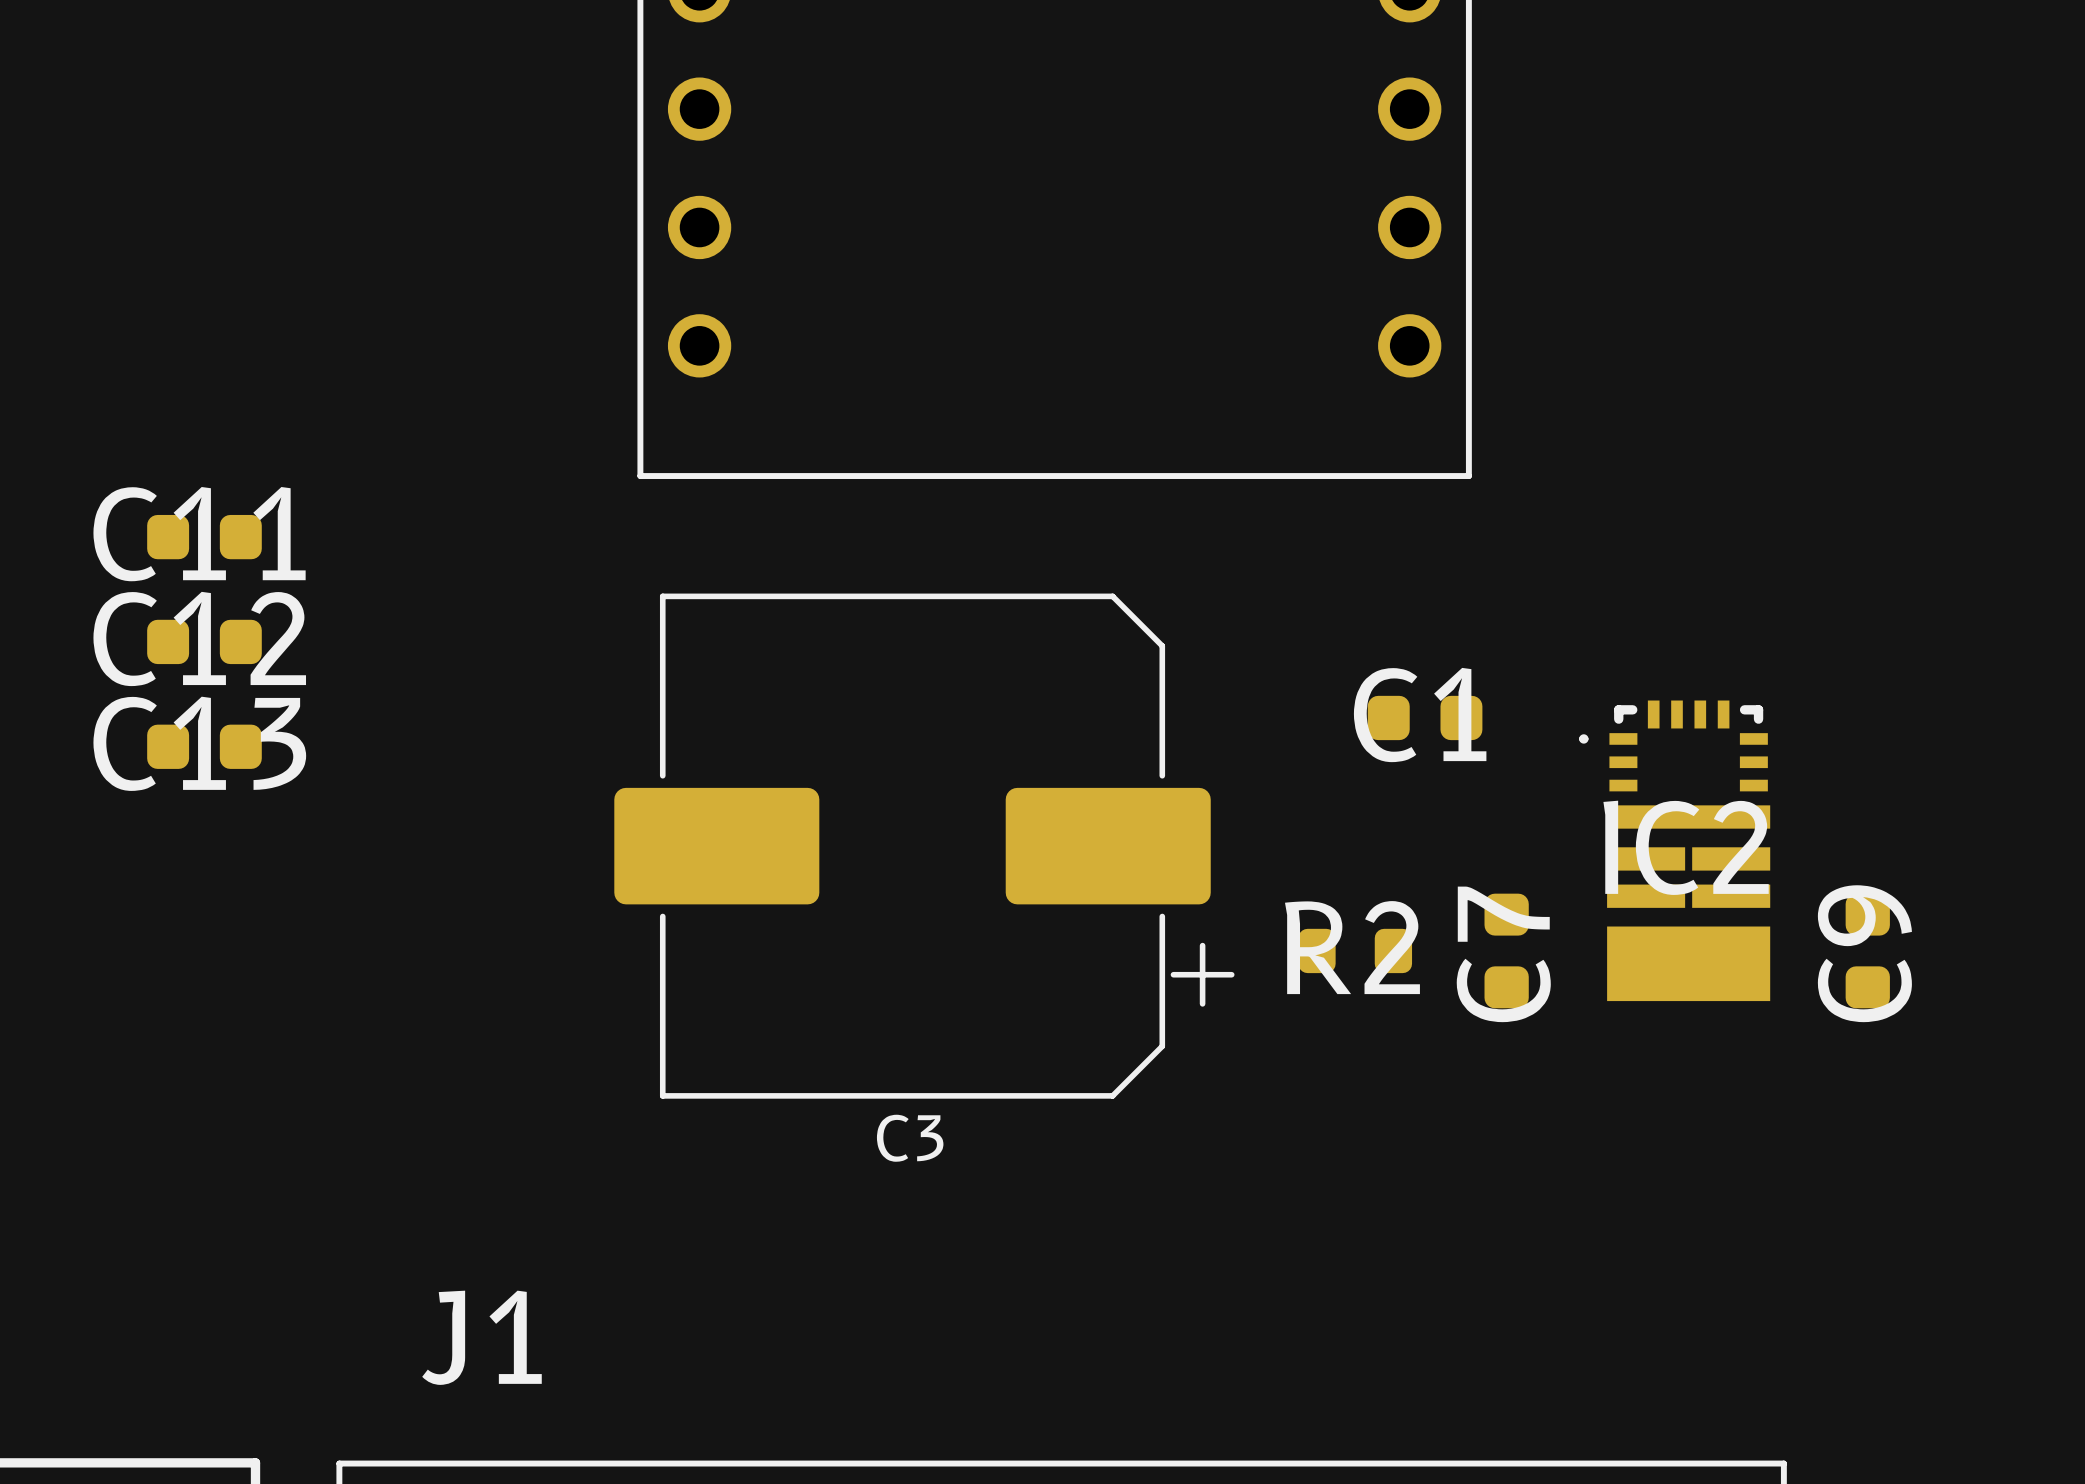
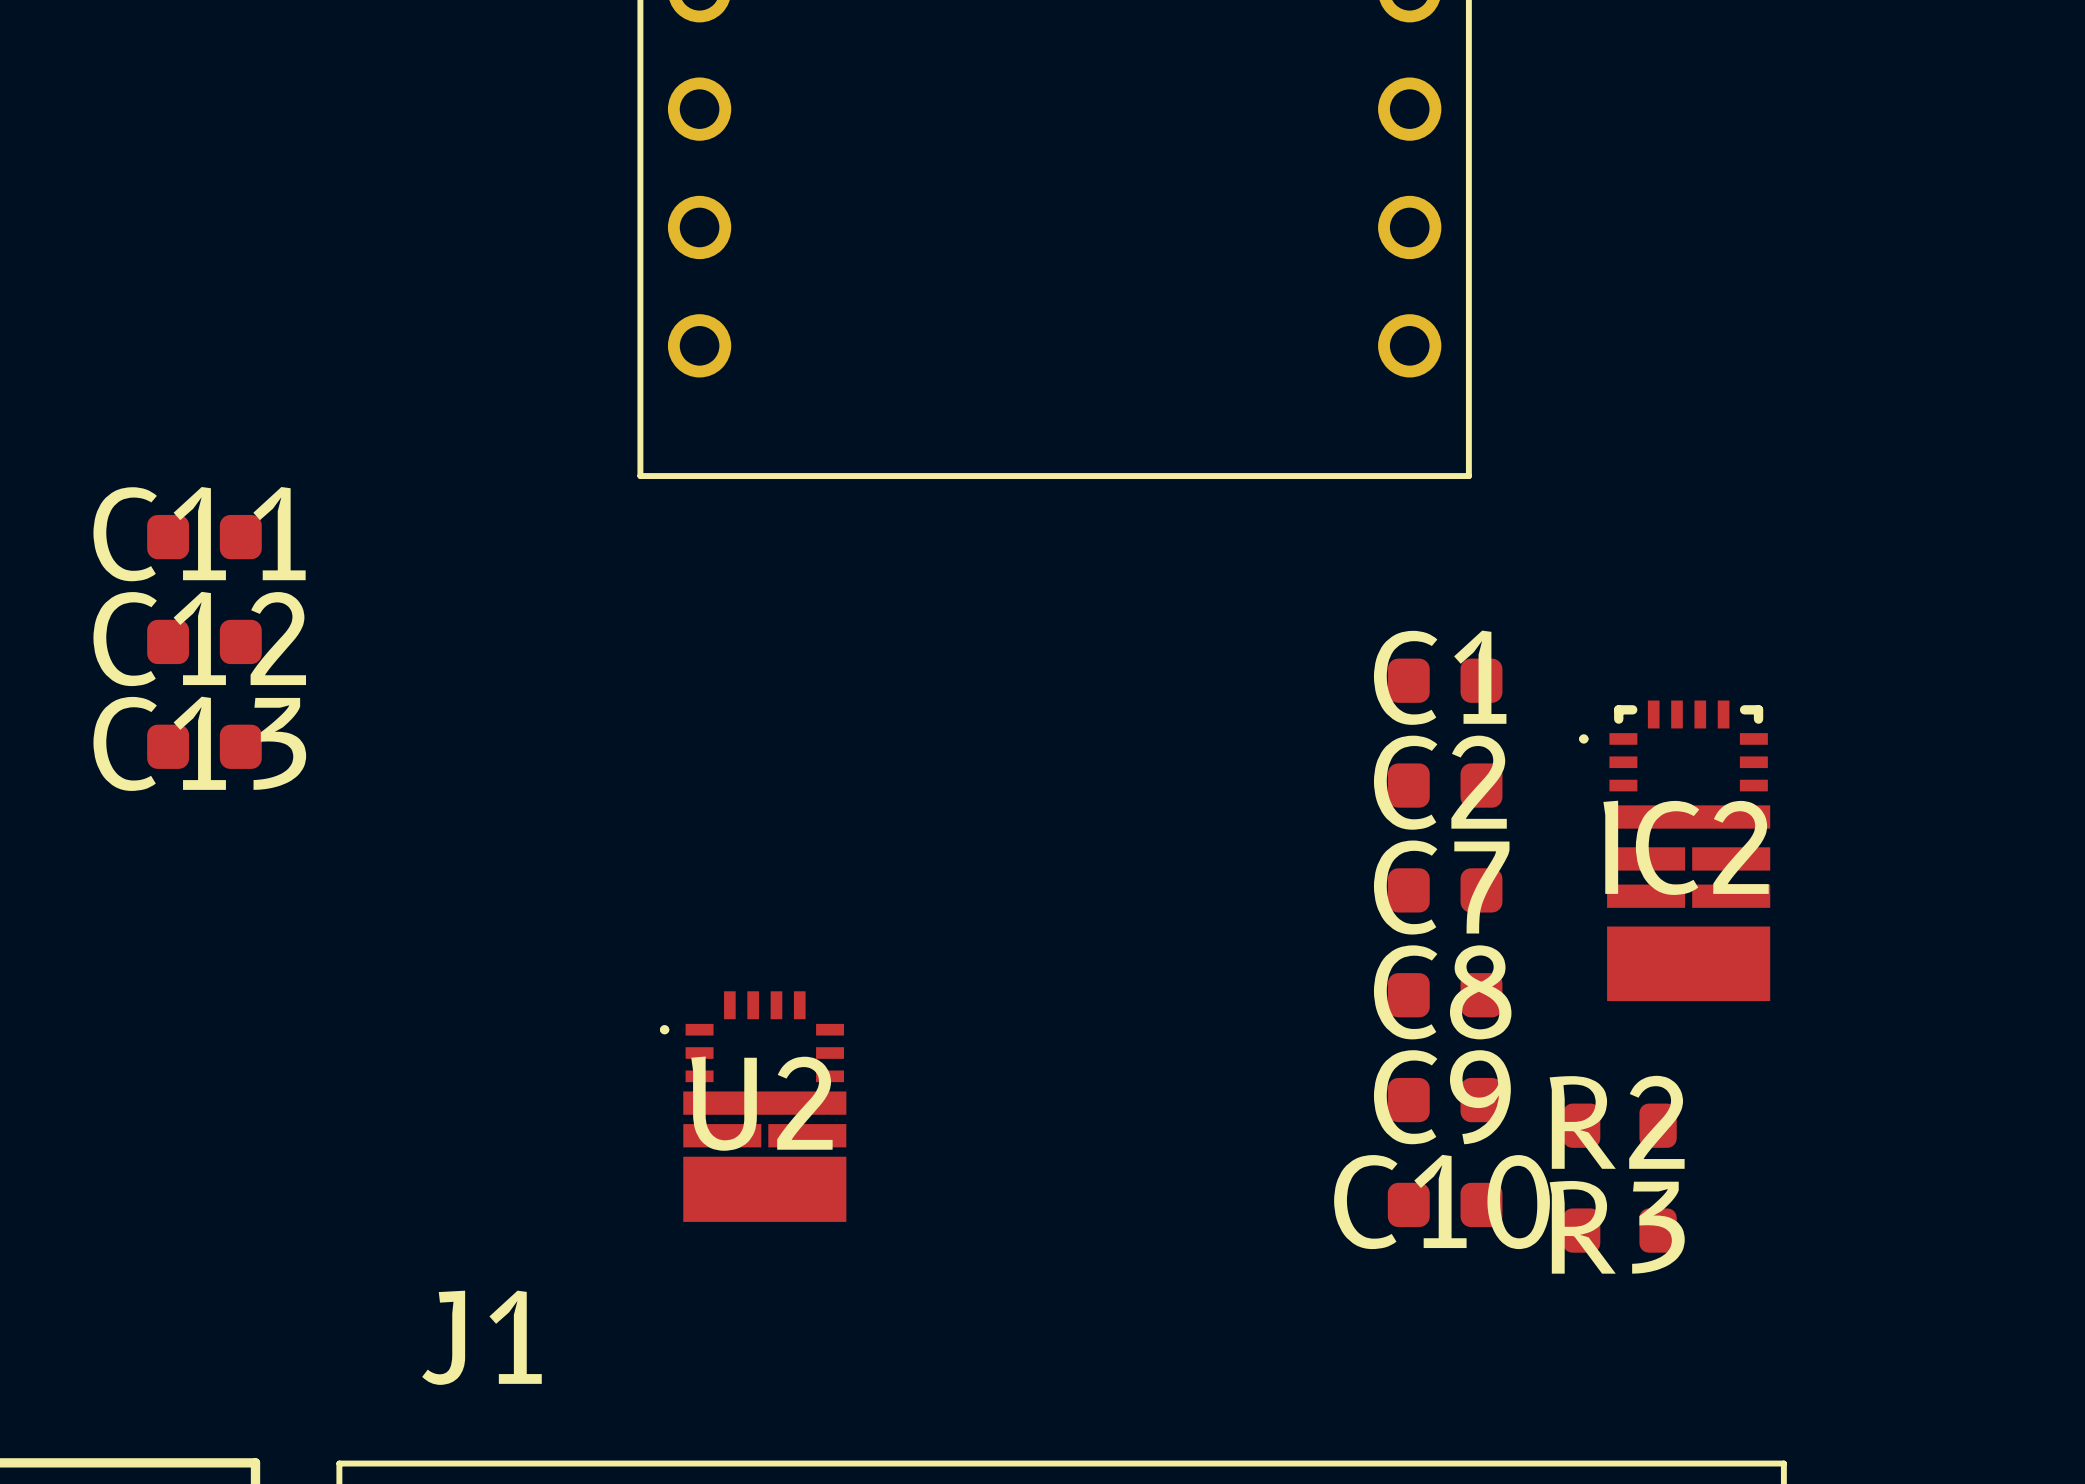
C1 position: (1425, 717) -> (1445, 680)
C2: none -> (1445, 785)
C3: (924, 846) -> none
R2 position: (1355, 950) -> (1619, 1125)
C7 rotation: 0° (1506, 950) -> 90° clockwise (1445, 890)
C7 position: (1506, 950) -> (1445, 890)
C9 rotation: 0° (1867, 950) -> 90° clockwise (1445, 1100)
C9 position: (1867, 950) -> (1445, 1100)
C8: none -> (1445, 995)
U2: none -> (753, 1106)
C10: none -> (1445, 1204)
R3: none -> (1619, 1230)

